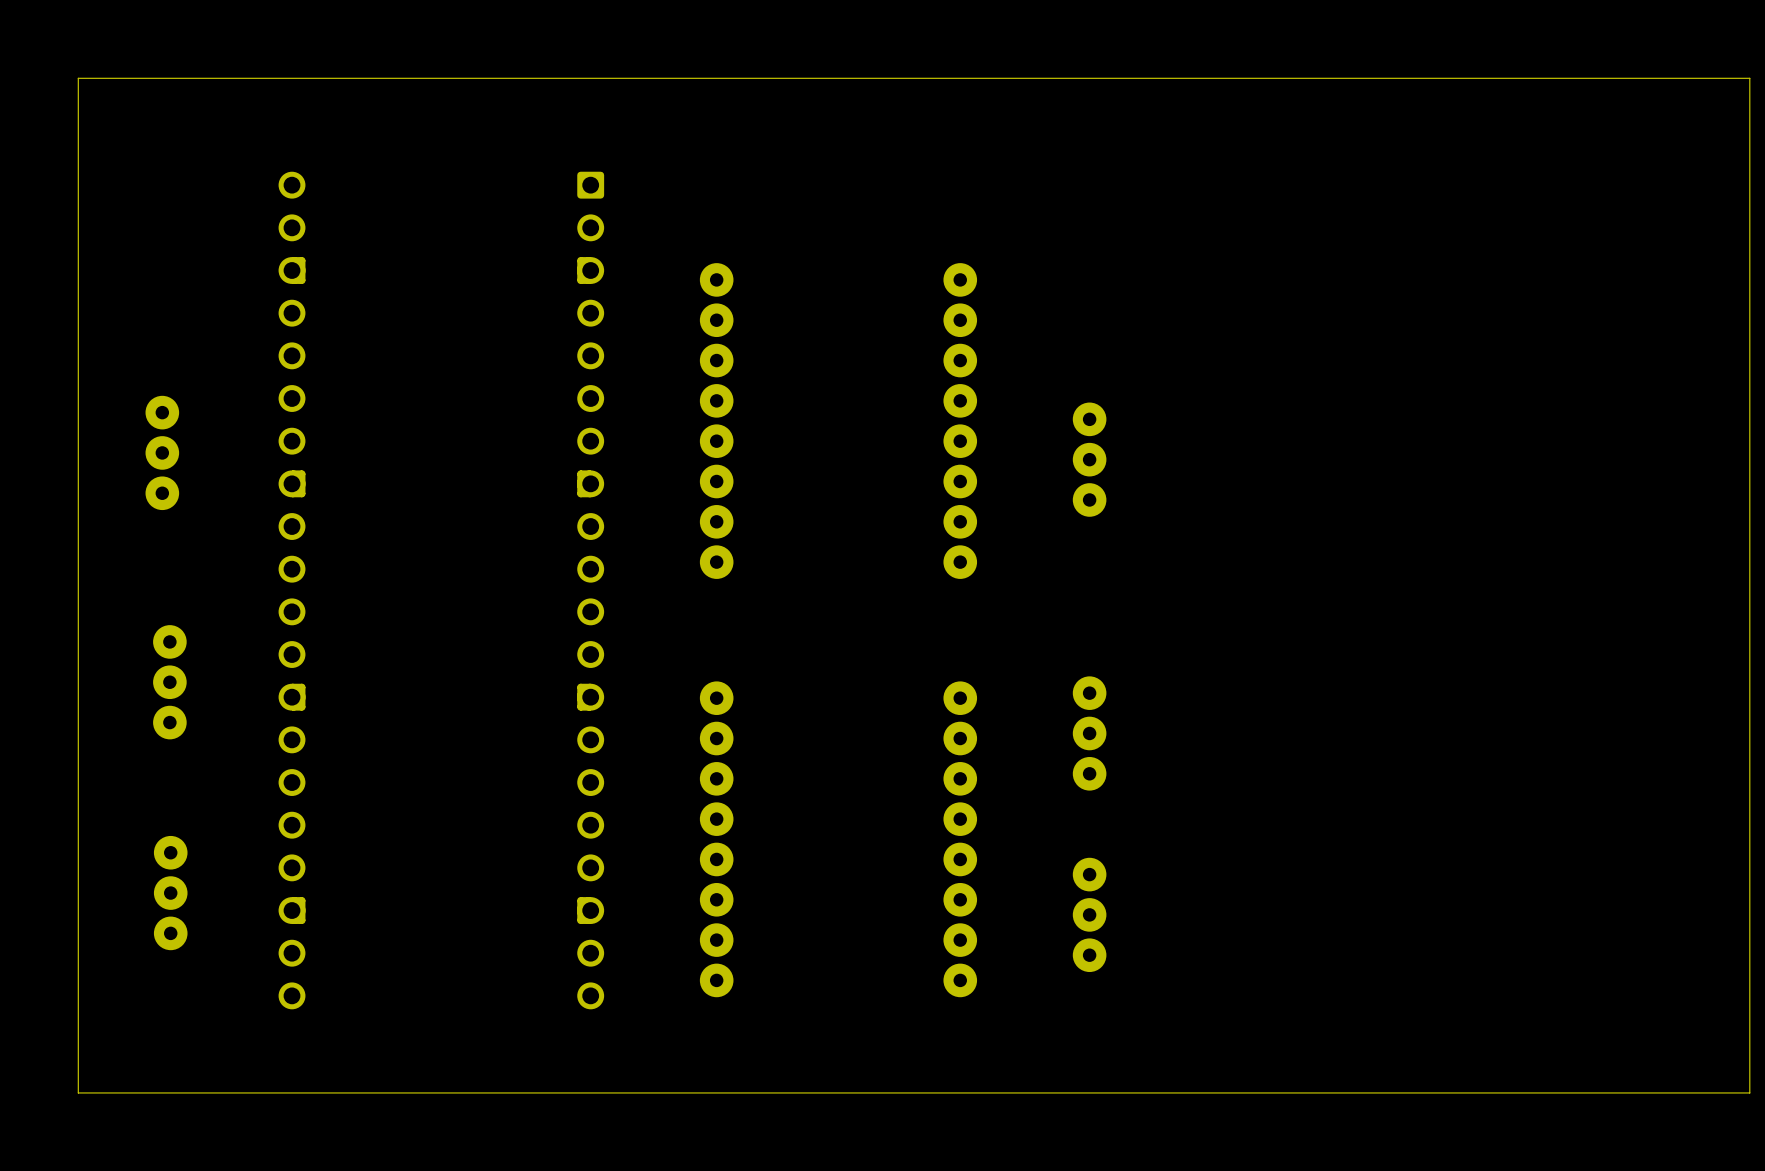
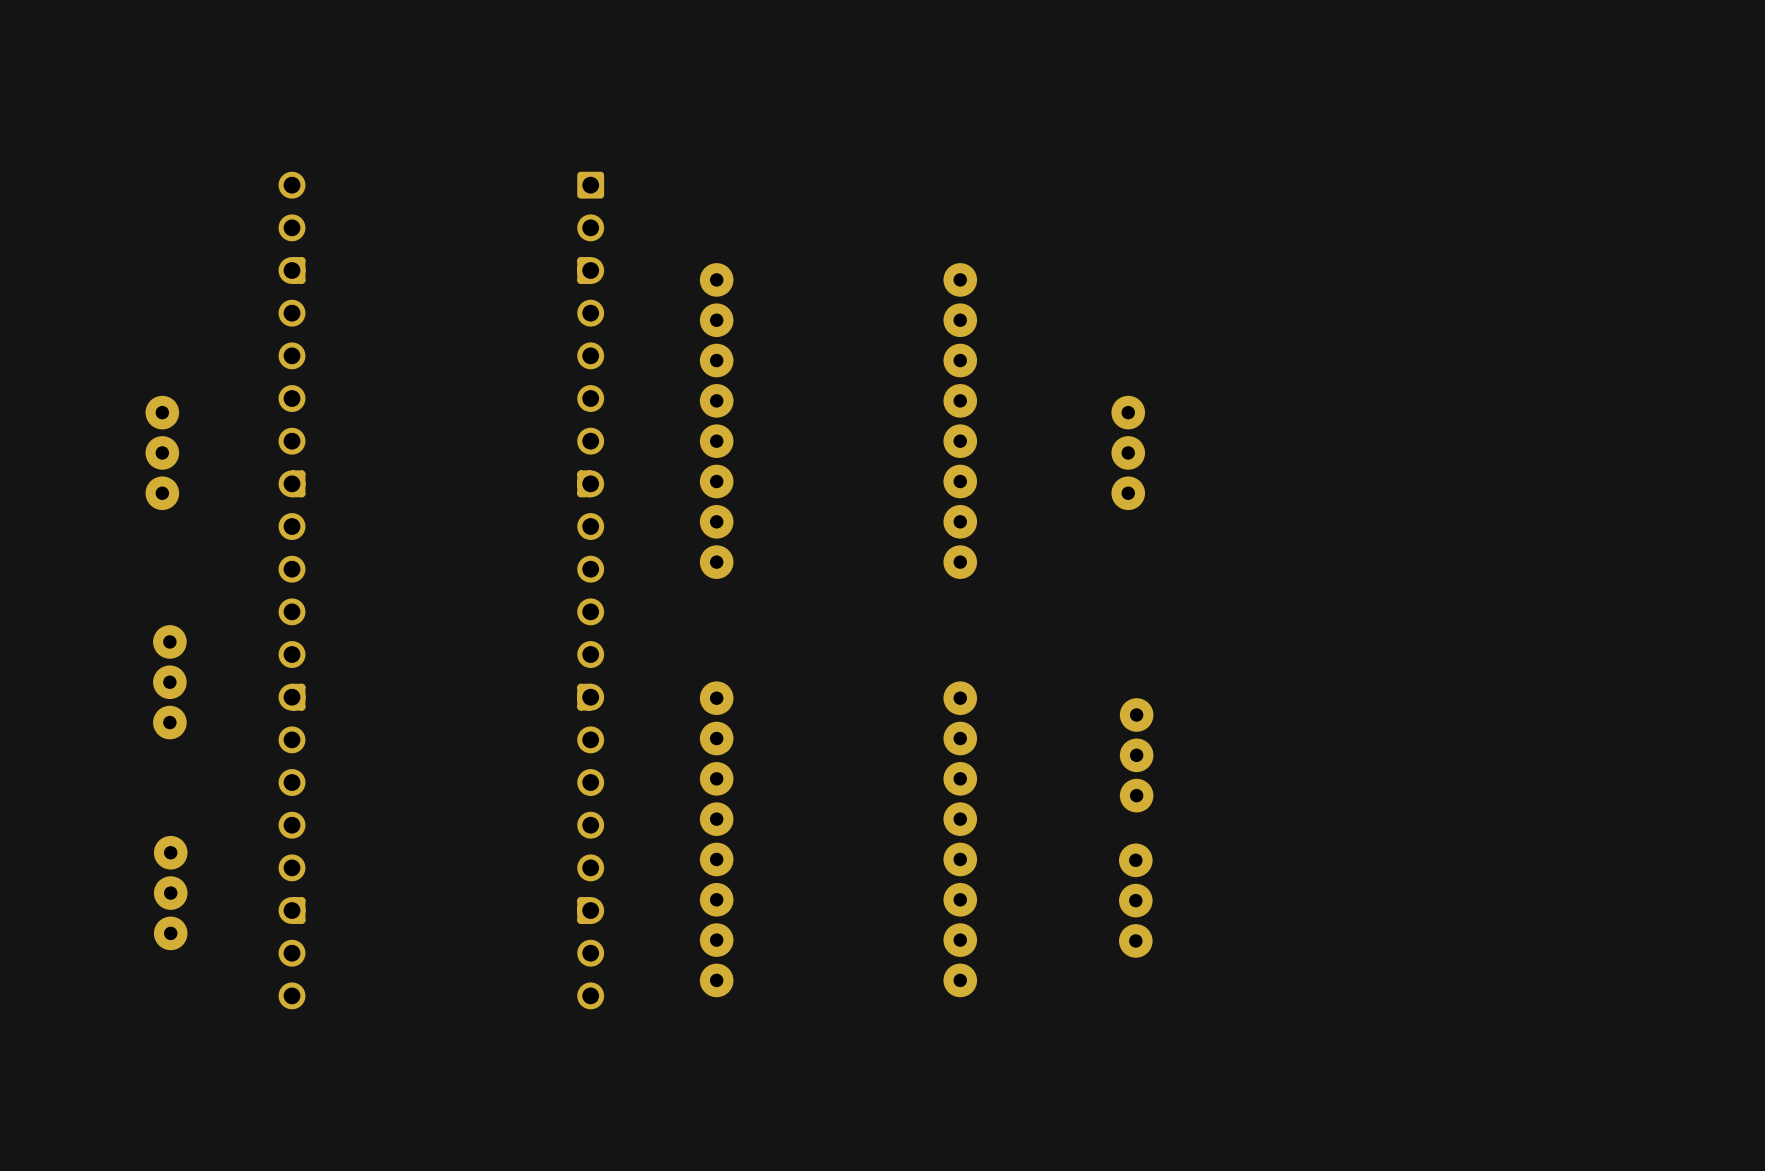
board edge: (1749, 78) (78, 78) (78, 1092) (1749, 1092) (1749, 78) -> none
part position: (1089, 459) -> (1128, 452)
part position: (1089, 733) -> (1136, 755)
part position: (1089, 914) -> (1135, 900)

